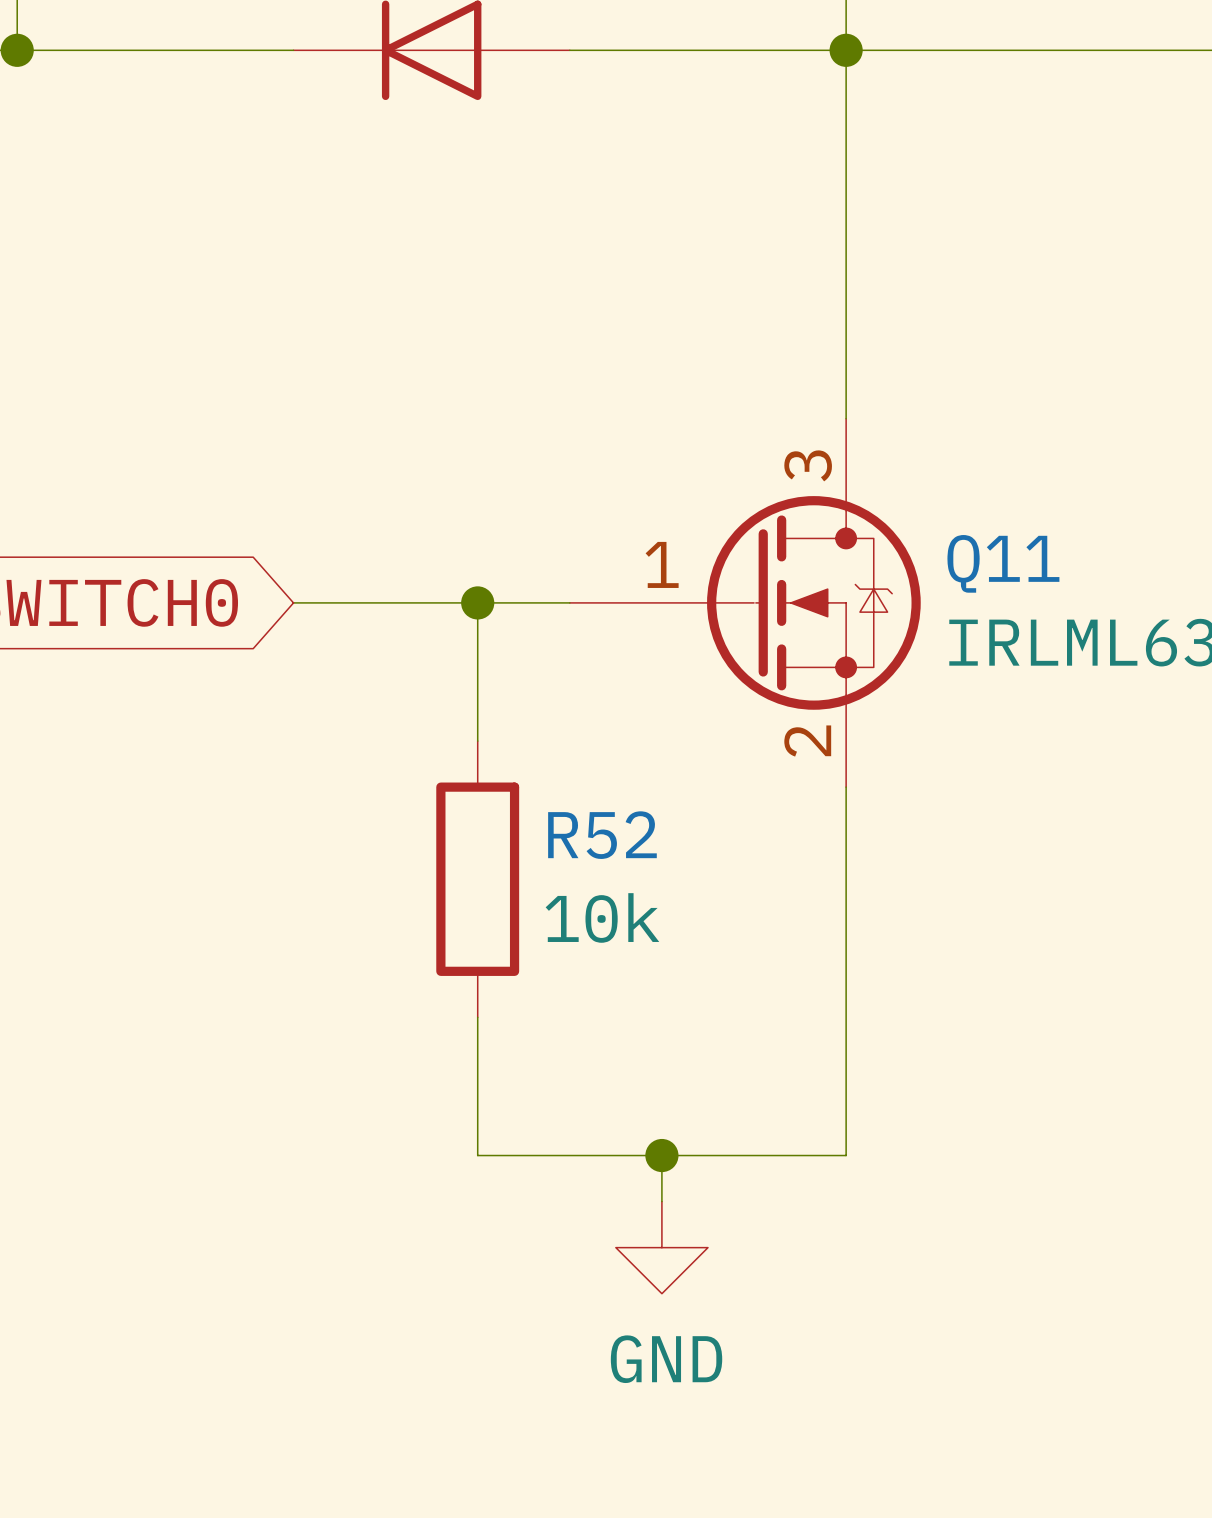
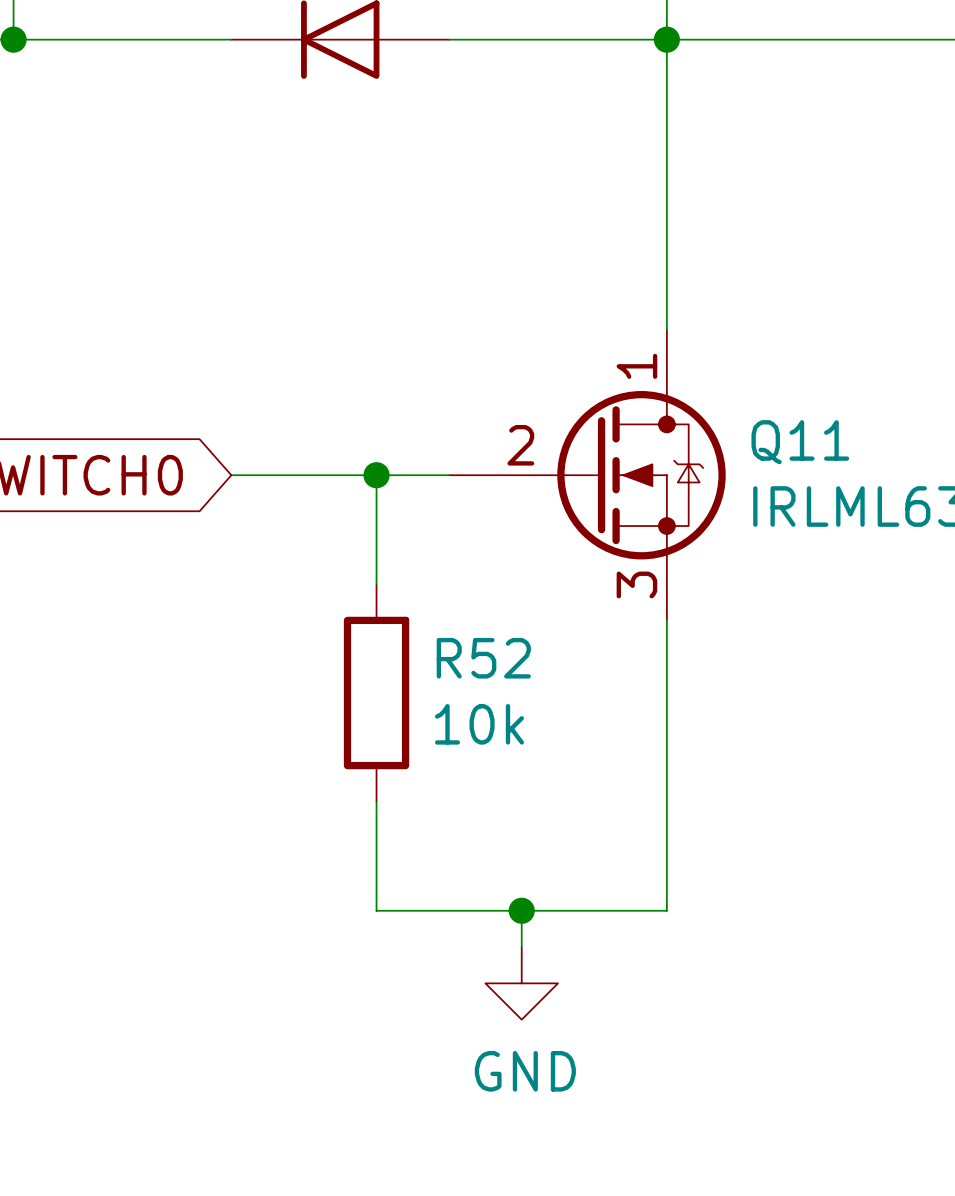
Q11 pin number: 3 (808, 465) -> 1 (636, 366)
Q11 pin number: 1 (662, 564) -> 2 (520, 445)
Q11 pin number: 2 (807, 741) -> 3 (636, 584)

